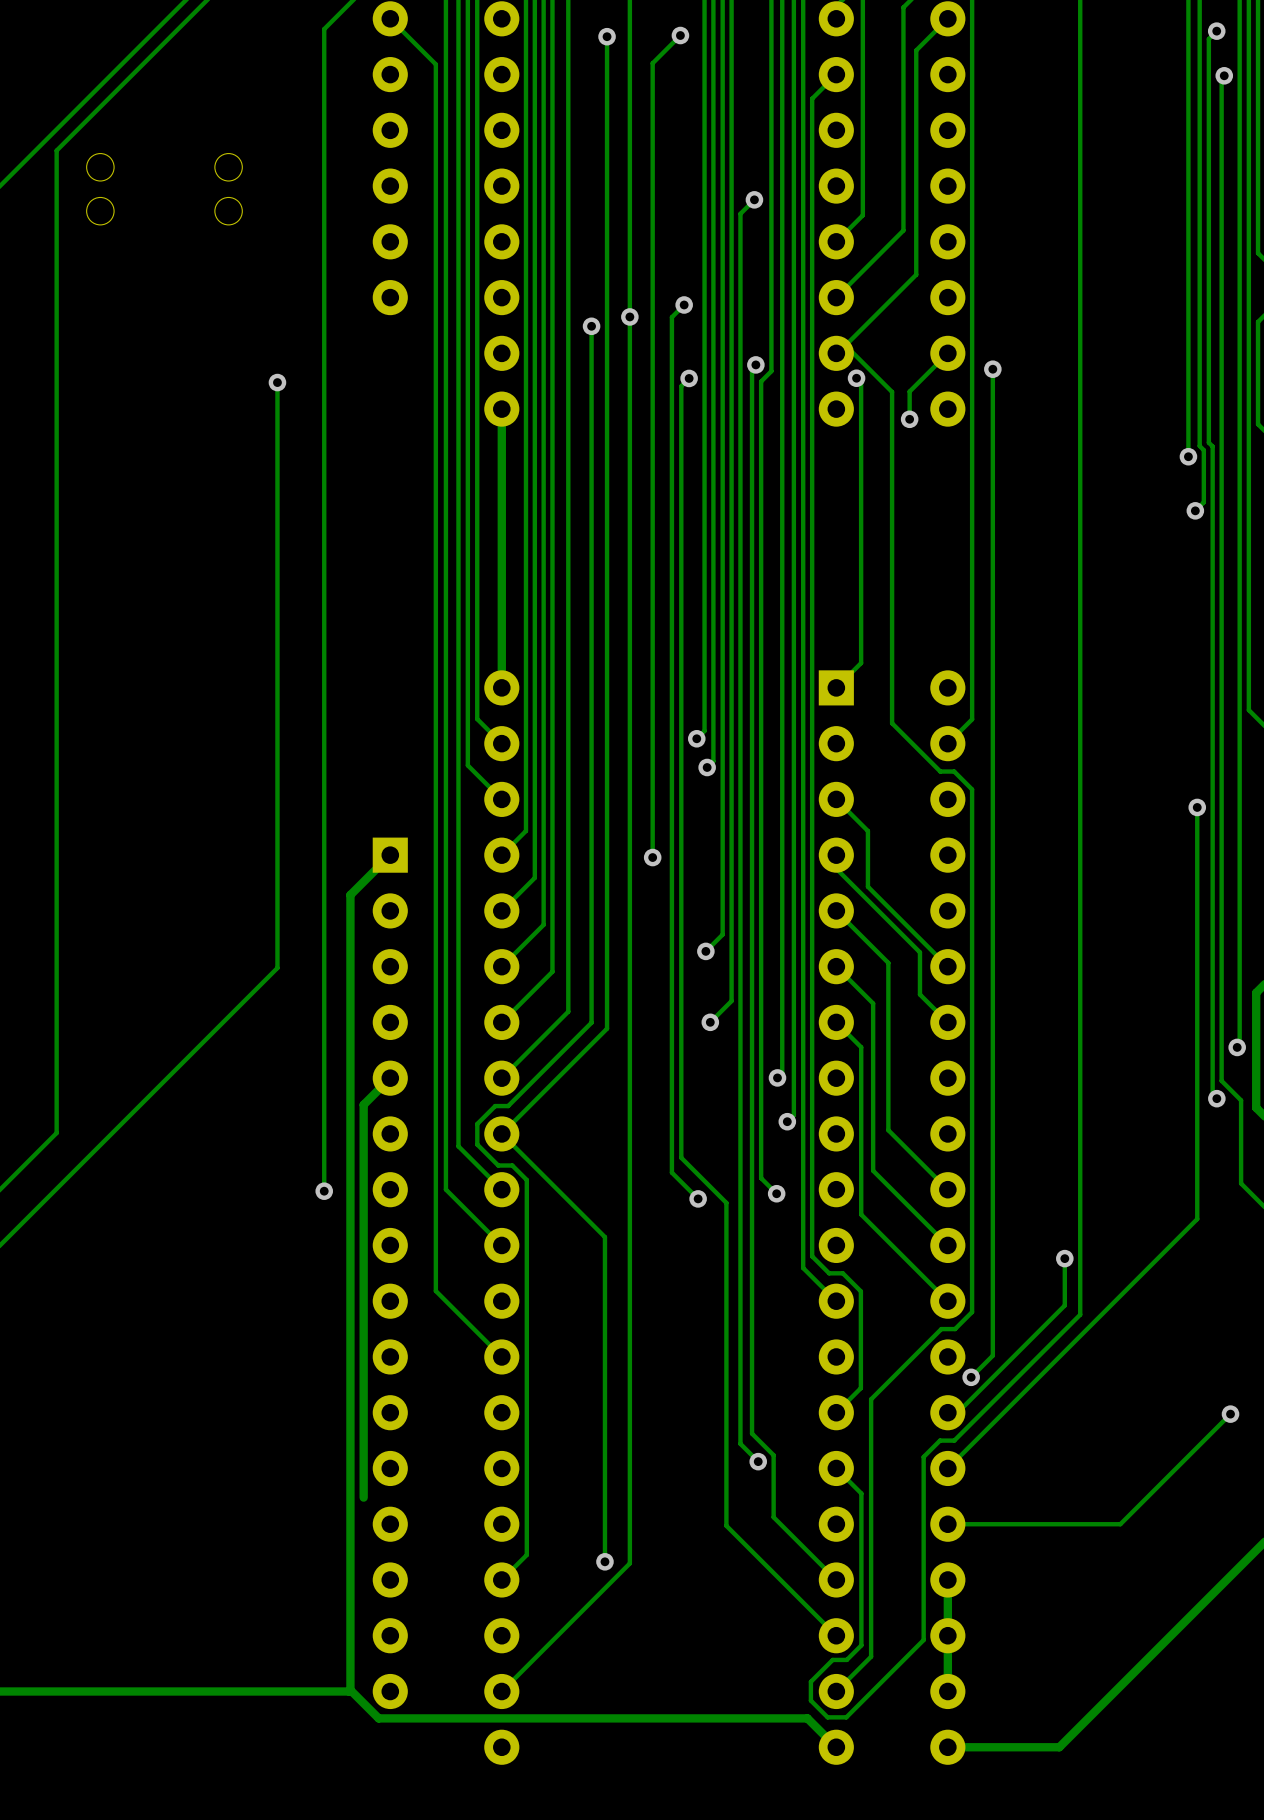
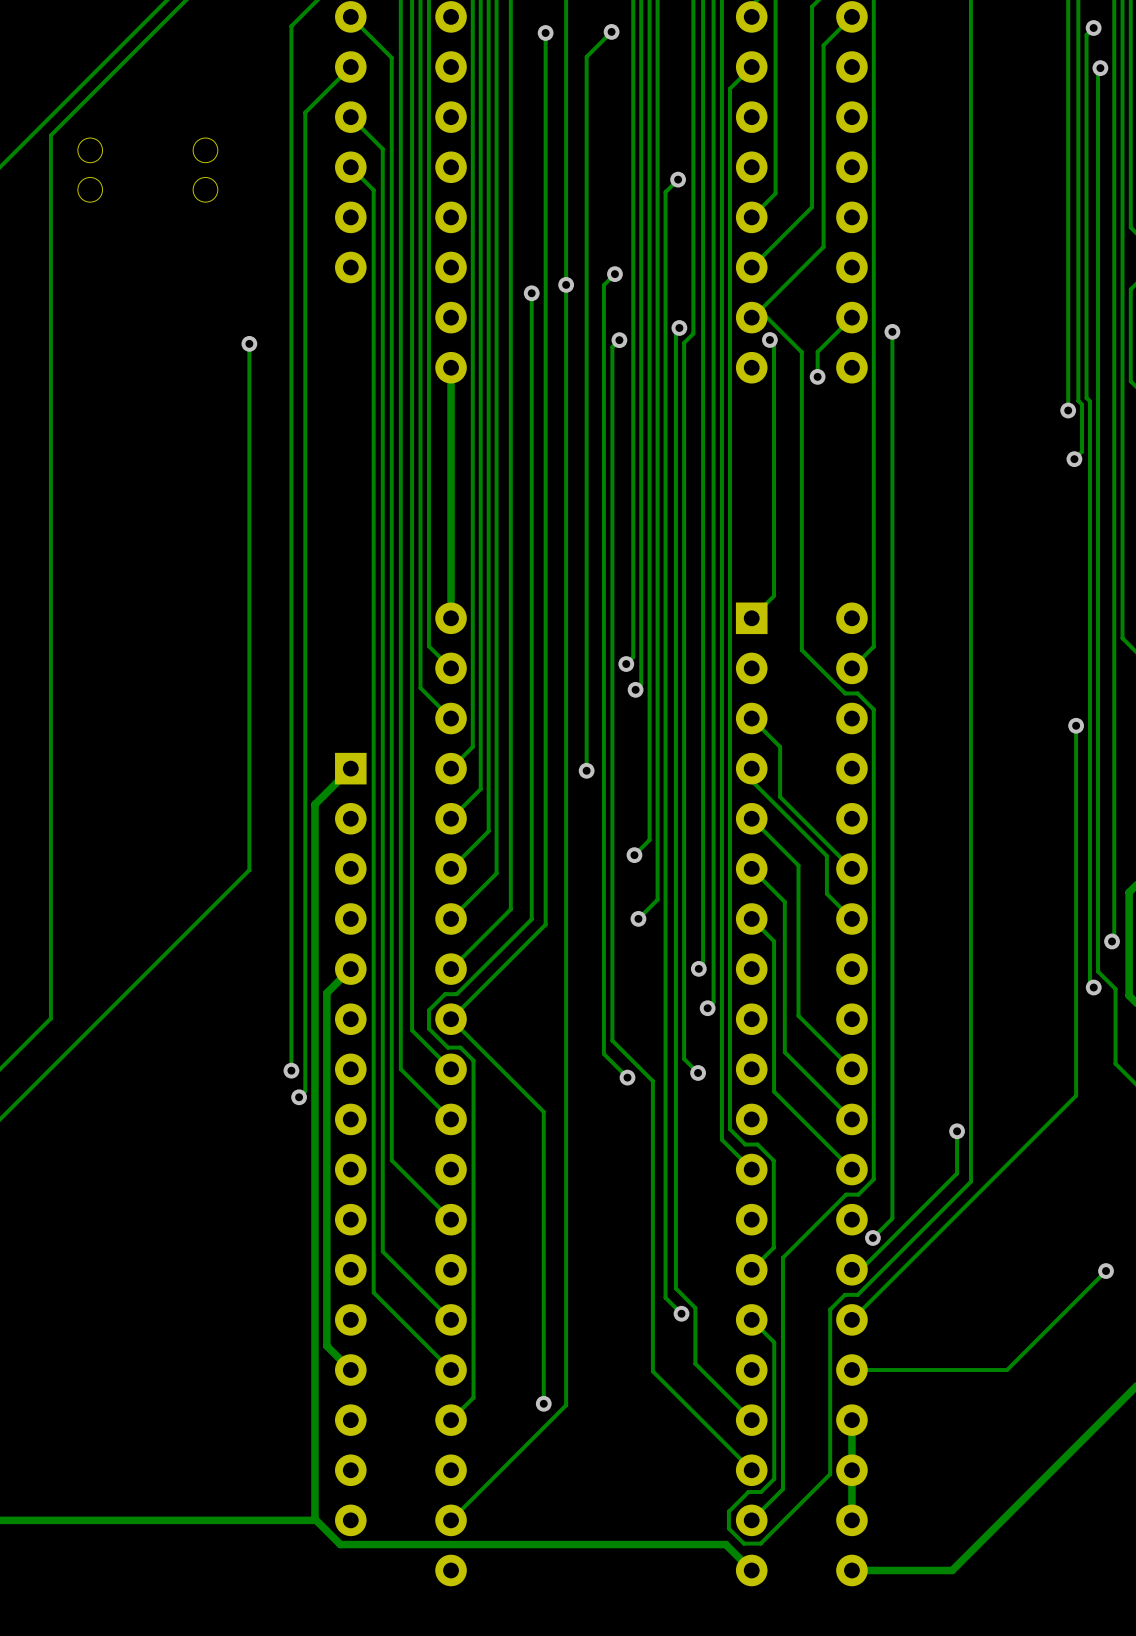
track: none -> (350, 67) (305, 112) (305, 1091) (299, 1097)
track: none -> (350, 117) (382, 149) (382, 1251) (451, 1319)
track: none -> (350, 167) (373, 190) (373, 1292) (451, 1370)
via: none -> (299, 1097)
track: none -> (326, 1346) (350, 1370)

